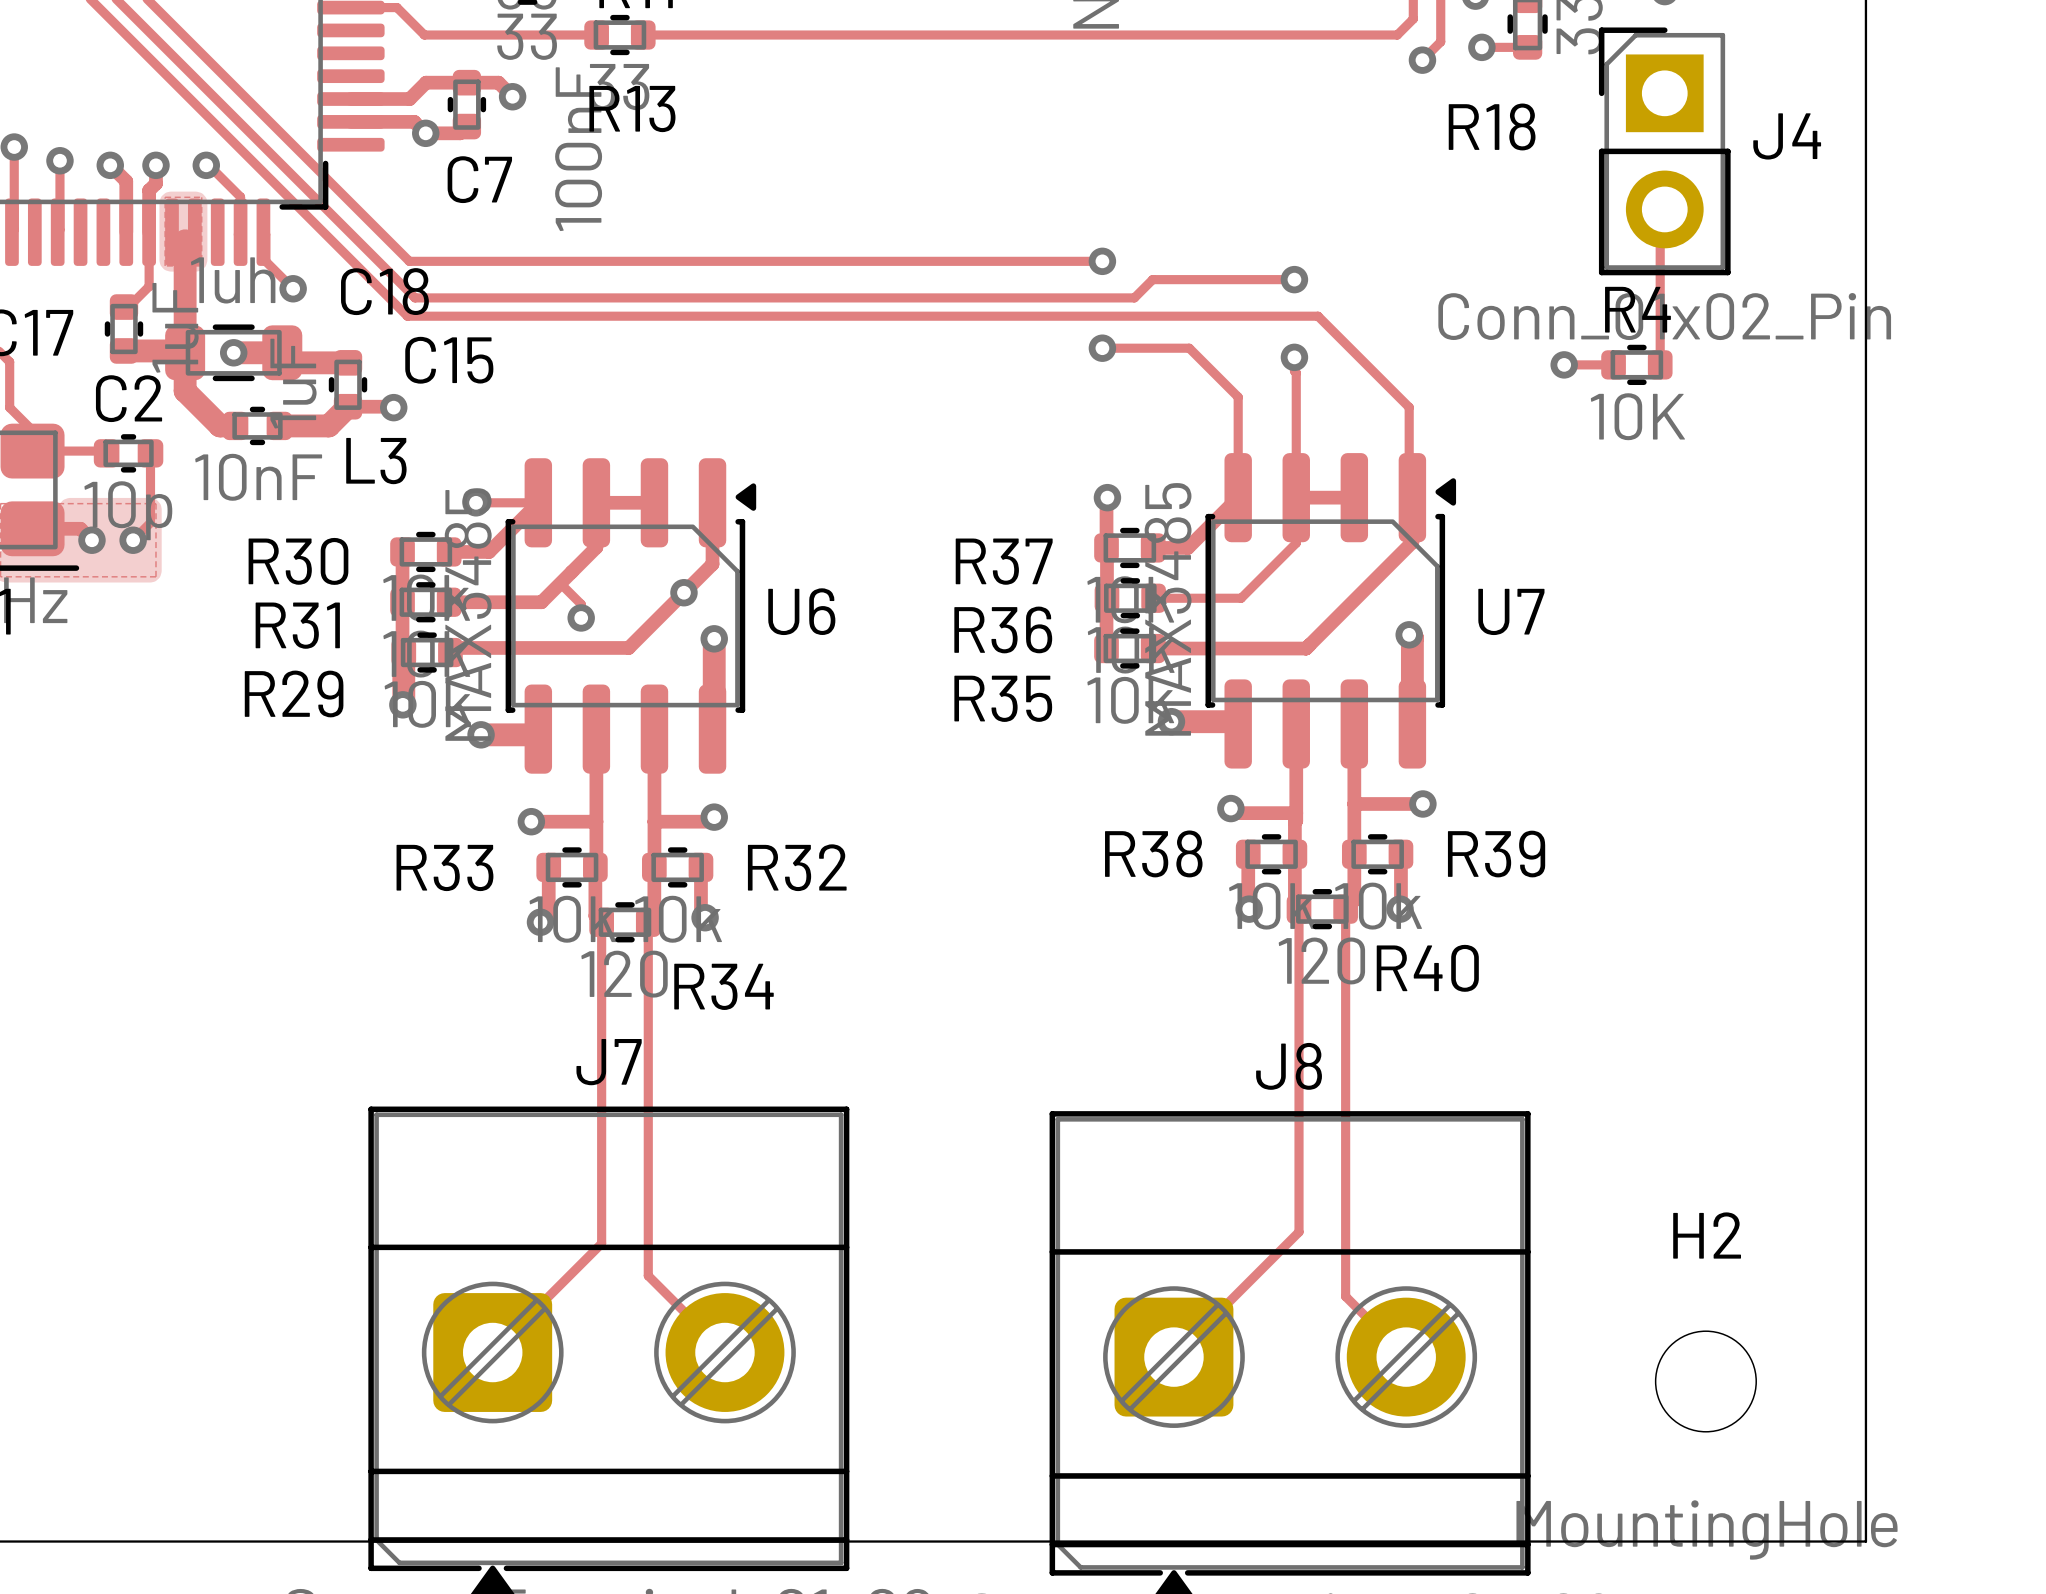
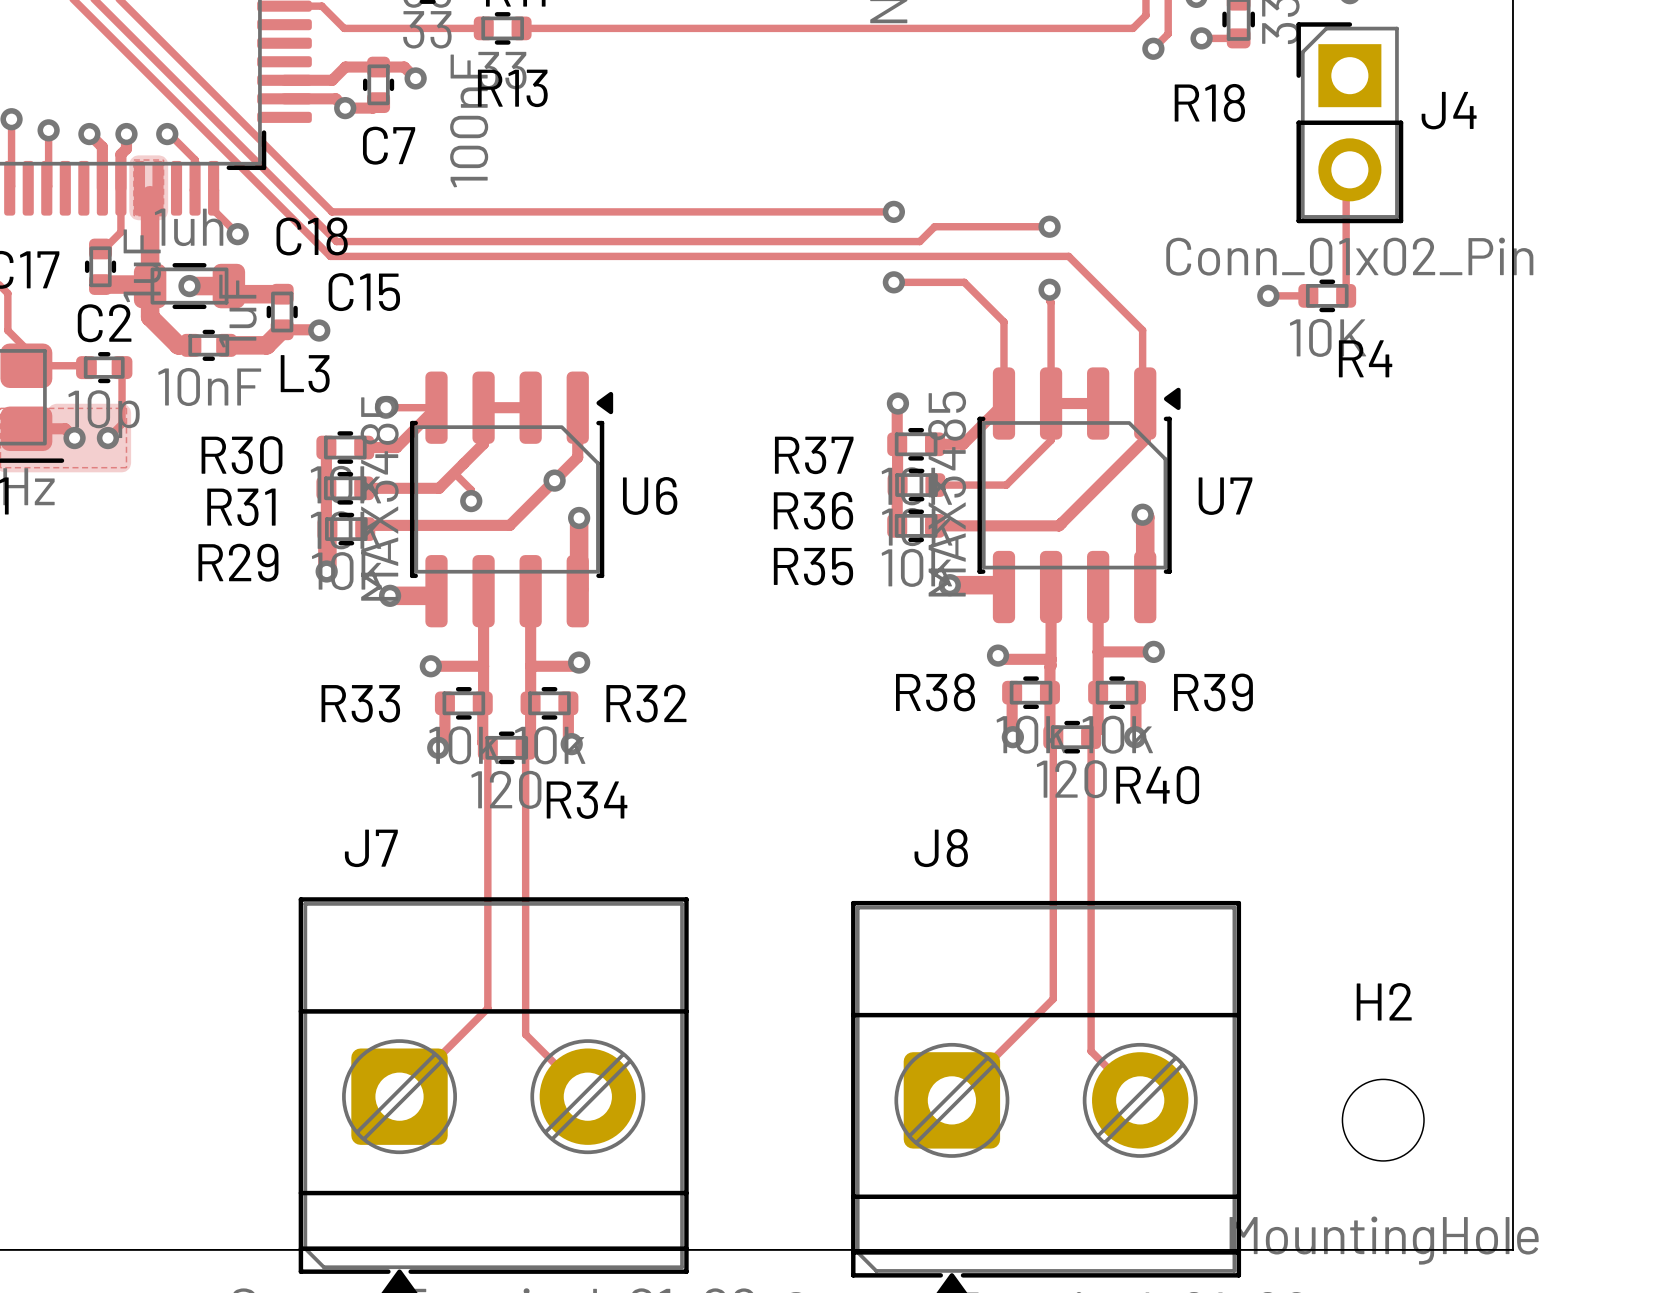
R4 name position: R4 (1637, 309) -> R4 (1365, 358)
J7 name position: J7 (609, 1062) -> J7 (371, 848)
J8 name position: J8 (1289, 1066) -> J8 (941, 848)

